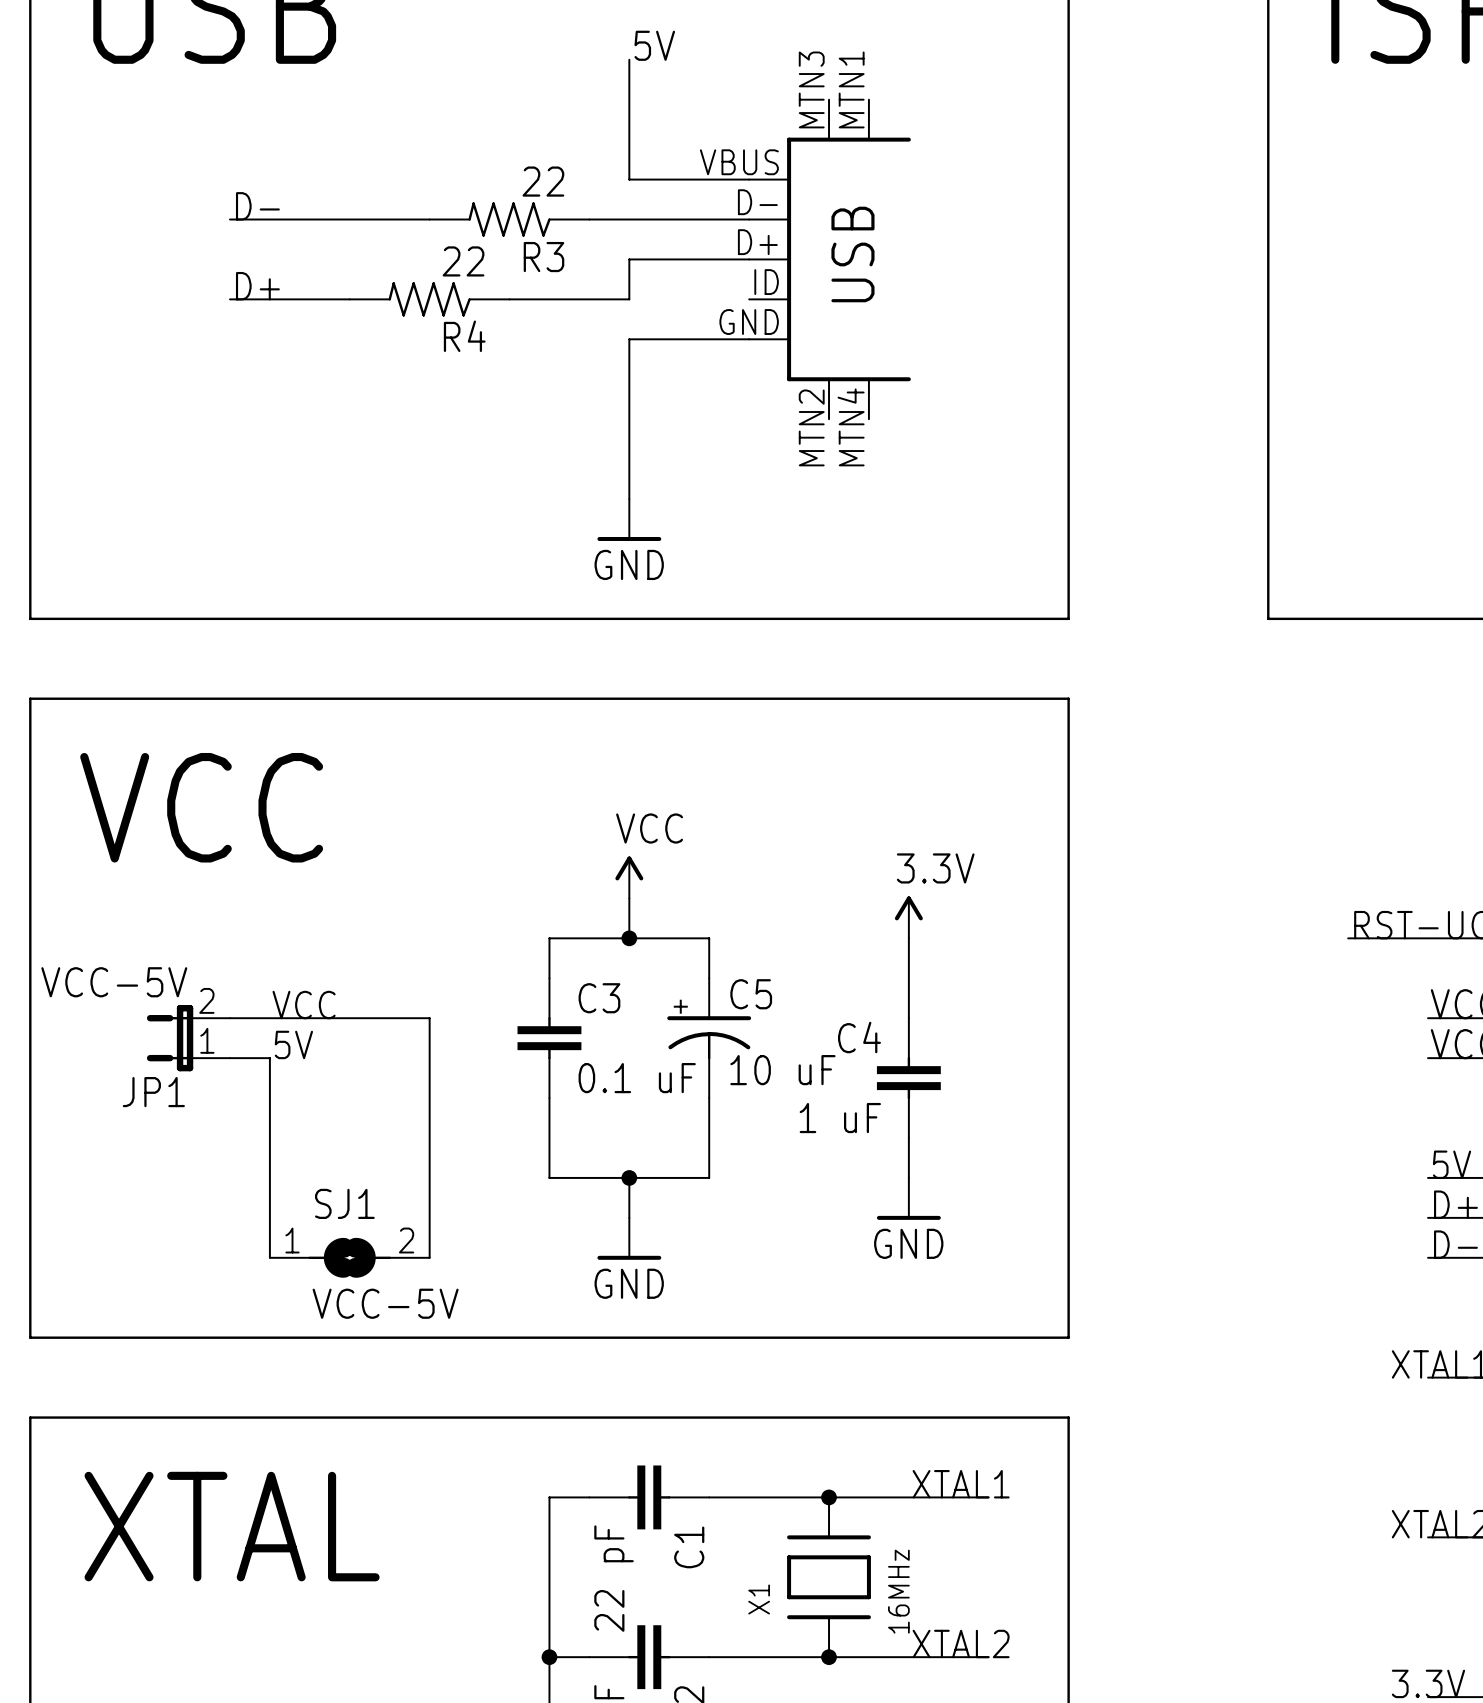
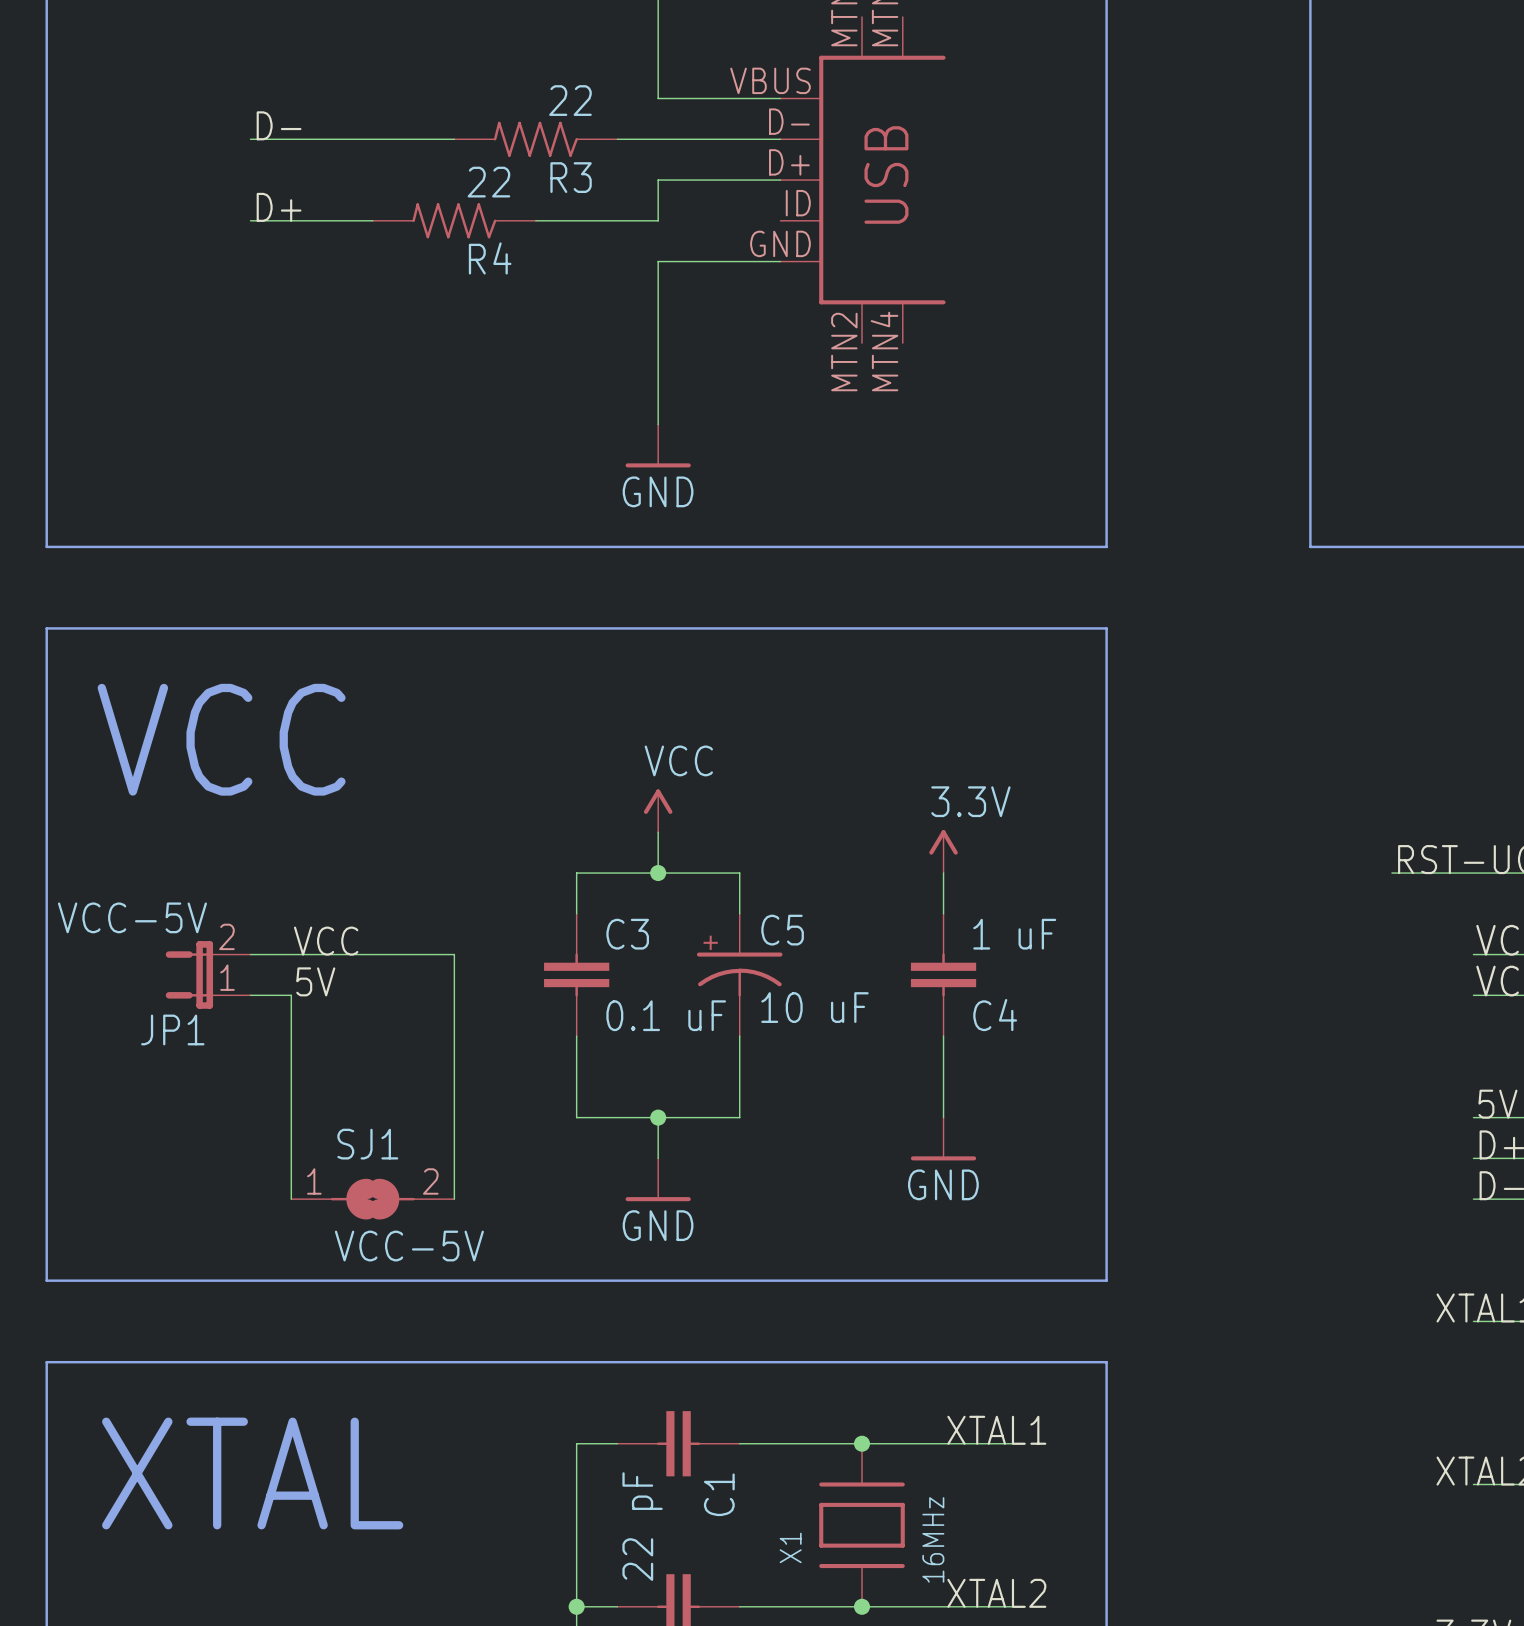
C4 name position: C4 (859, 1037) -> C4 (995, 1015)
C4 position: (908, 1078) -> (943, 974)
C4 value position: 1 uF (840, 1118) -> 1 uF (1014, 934)

